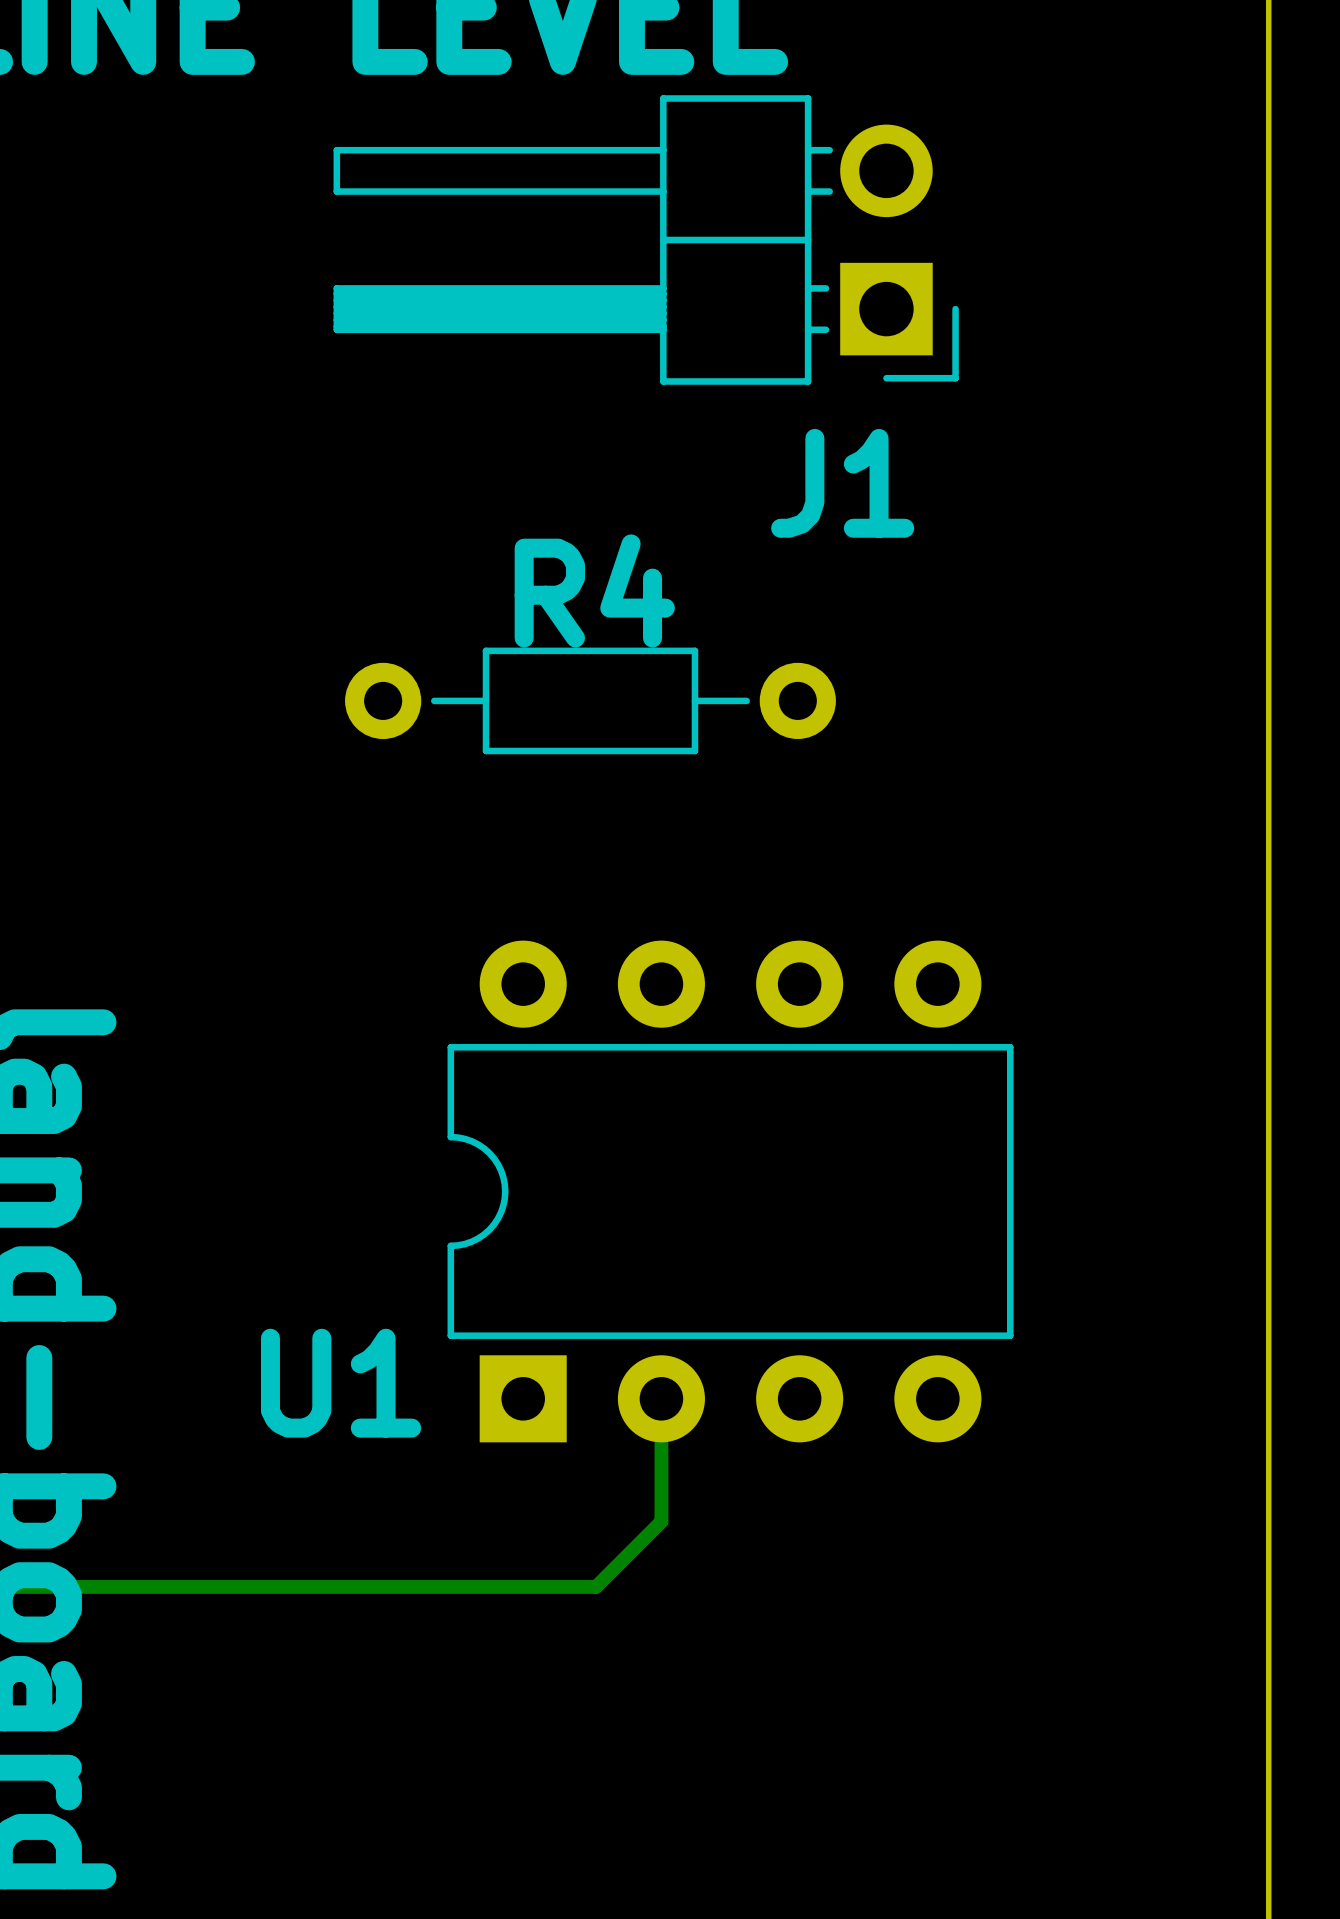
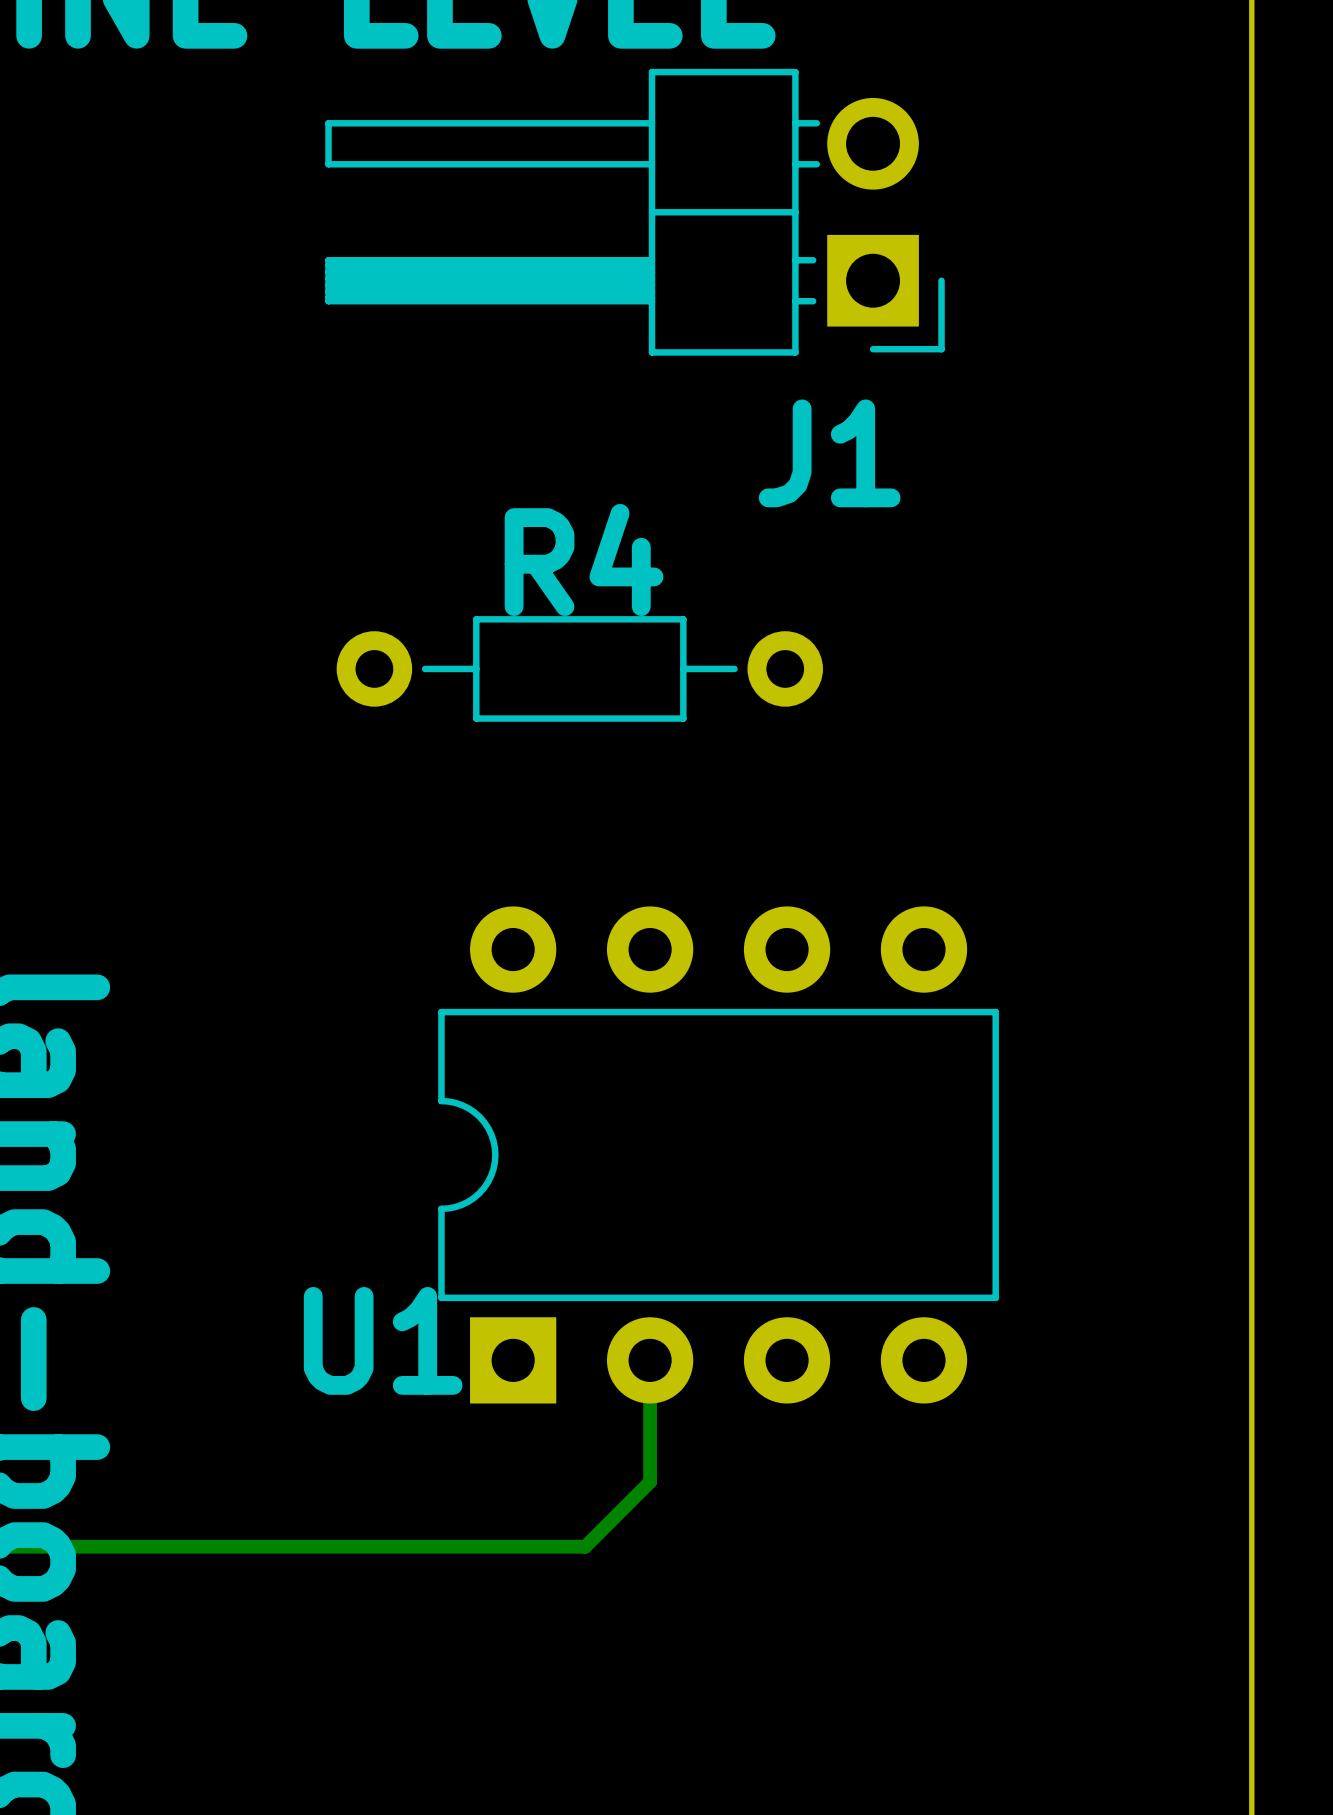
U1 name position: U1 (341, 1383) -> U1 (383, 1340)

